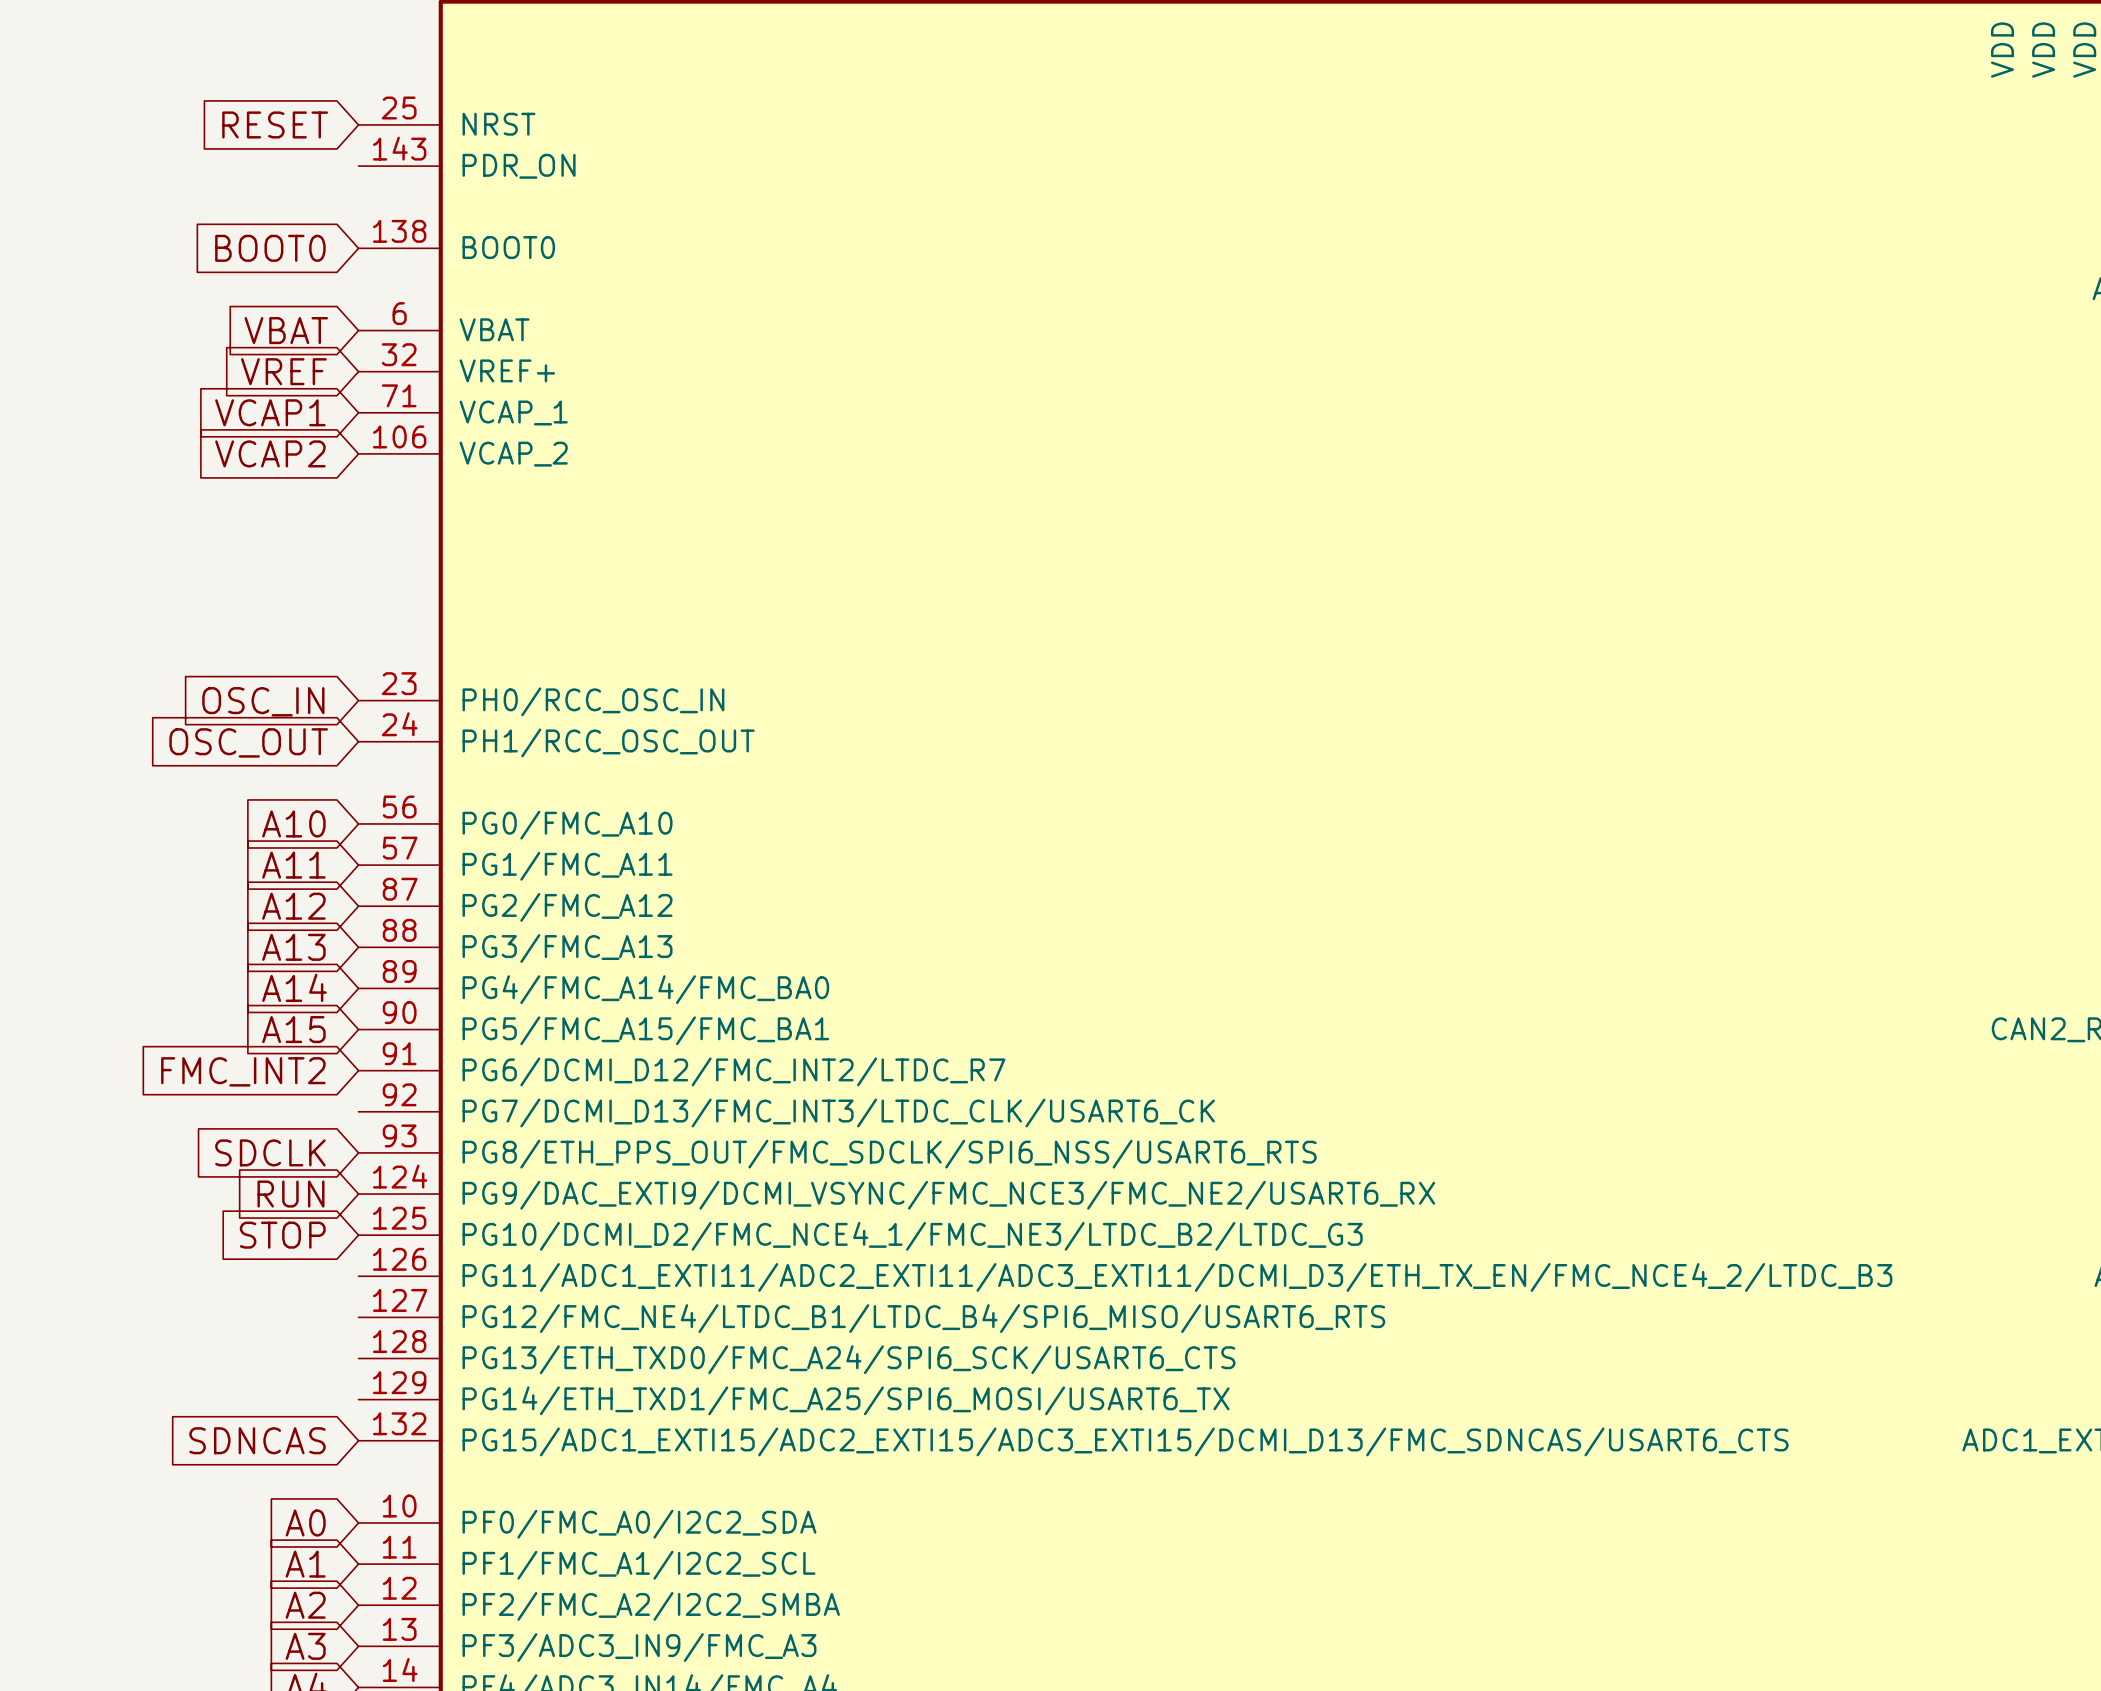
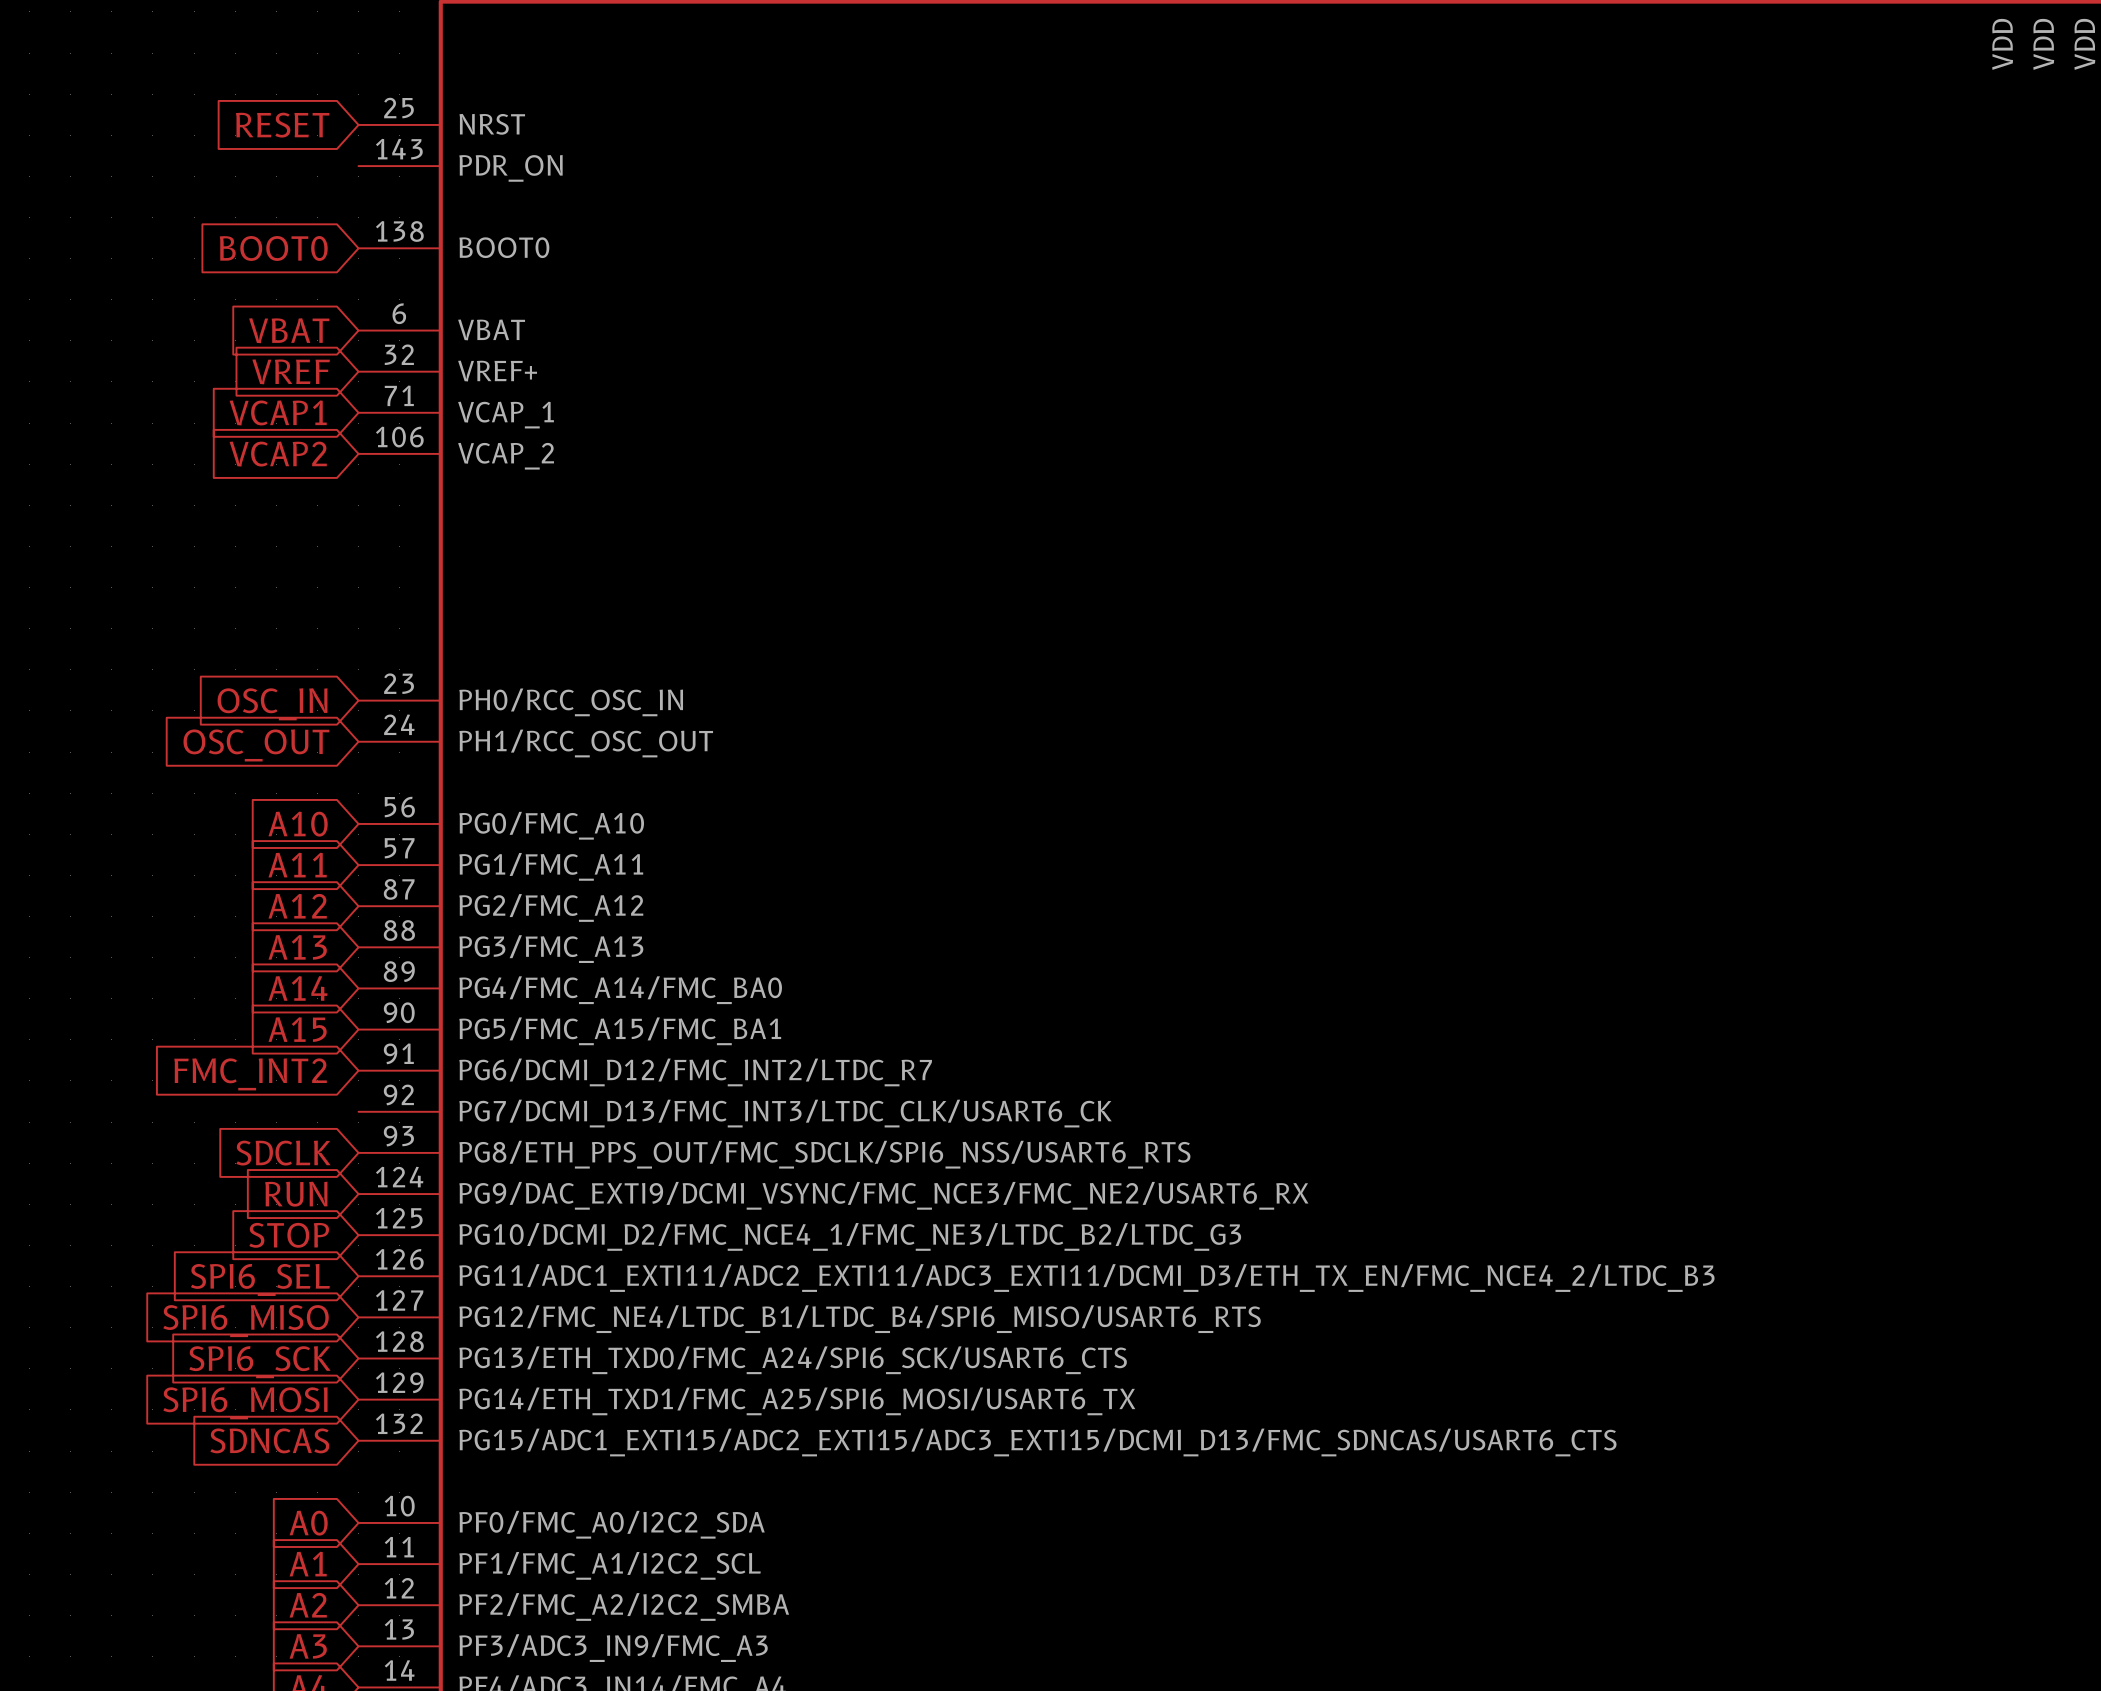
global label: none -> SPI6_SEL (260, 1279)
global label: none -> SPI6_MISO (246, 1321)
global label: none -> SPI6_SCK (259, 1362)
global label: none -> SPI6_MOSI (245, 1403)

